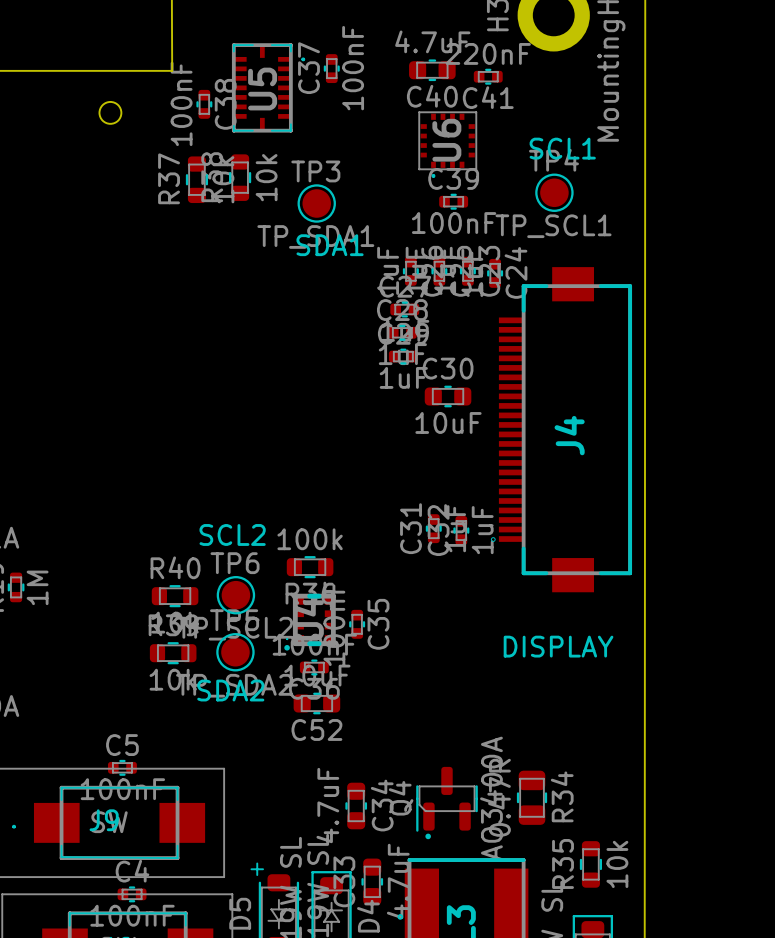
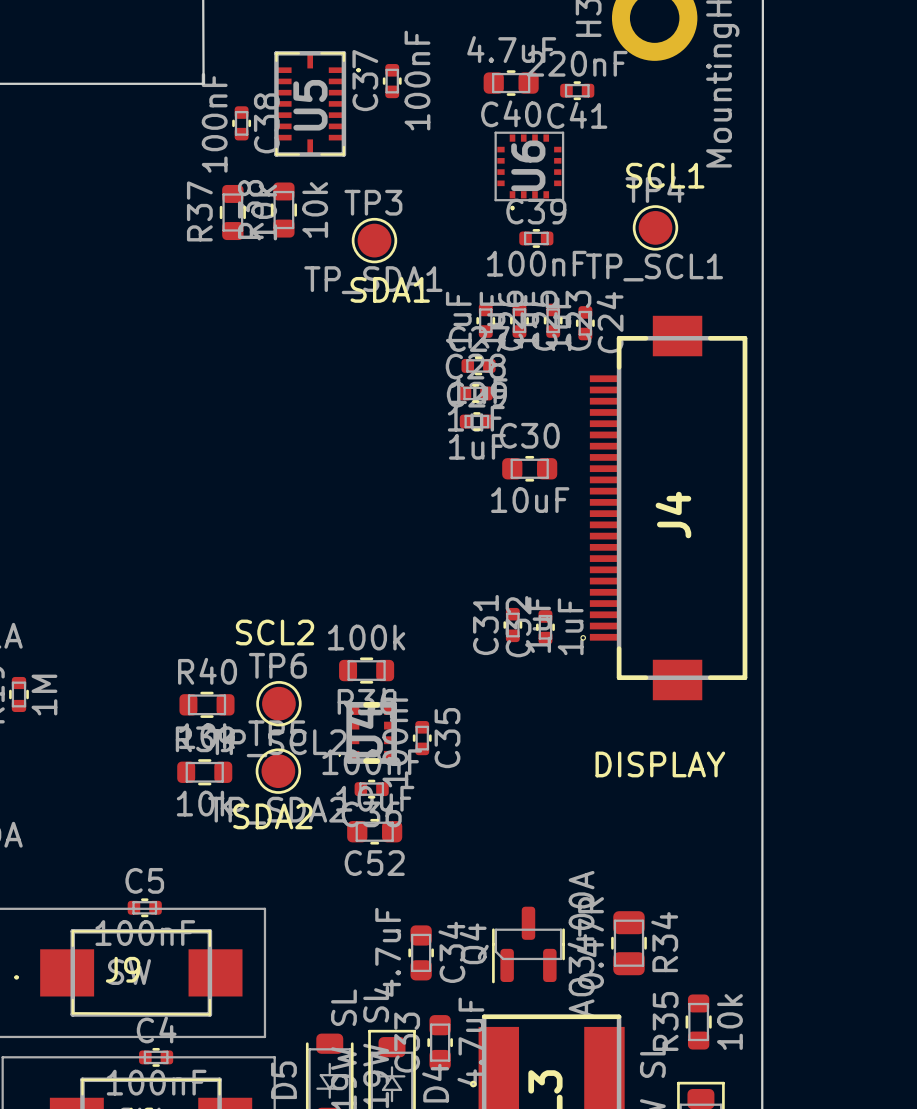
round board edge: [98, 100, 123, 125] -> none
drawing: [284, 645, 290, 651] -> none
drawing: [425, 833, 431, 840] -> none
text: + (257, 869) -> none

